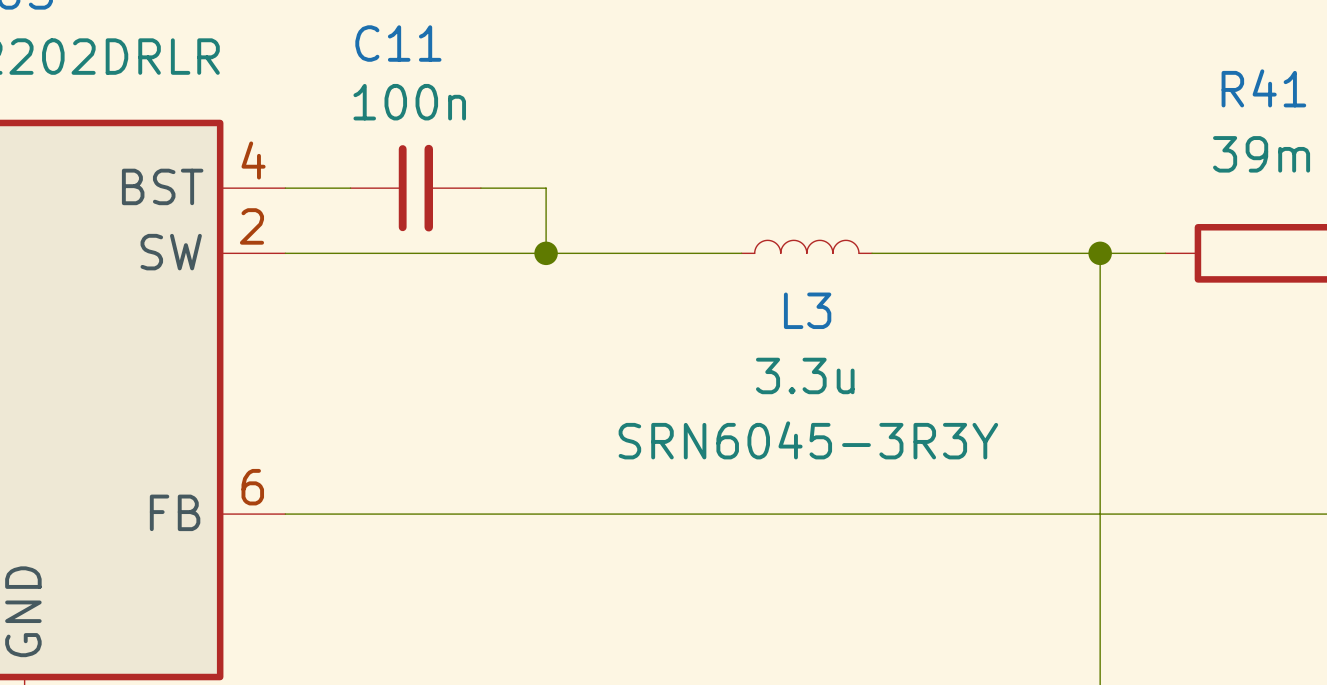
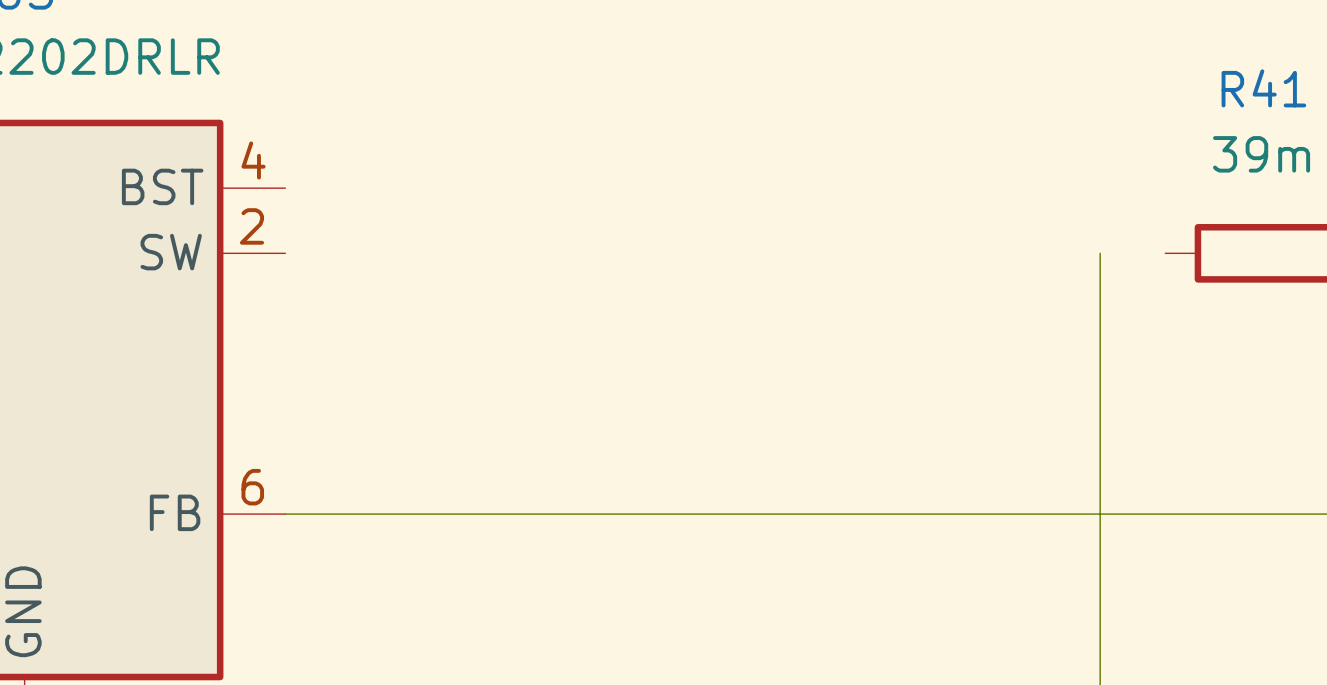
wire: (285, 188) (350, 188) -> none
C11: 100n (415, 188) -> none
wire: (480, 188) (546, 188) (546, 253) -> none
L3: 3.3u (806, 246) -> none
wire: (285, 253) (741, 253) -> none
junction: (546, 253) -> none
wire: (872, 253) (1165, 253) -> none
junction: (1100, 253) -> none

